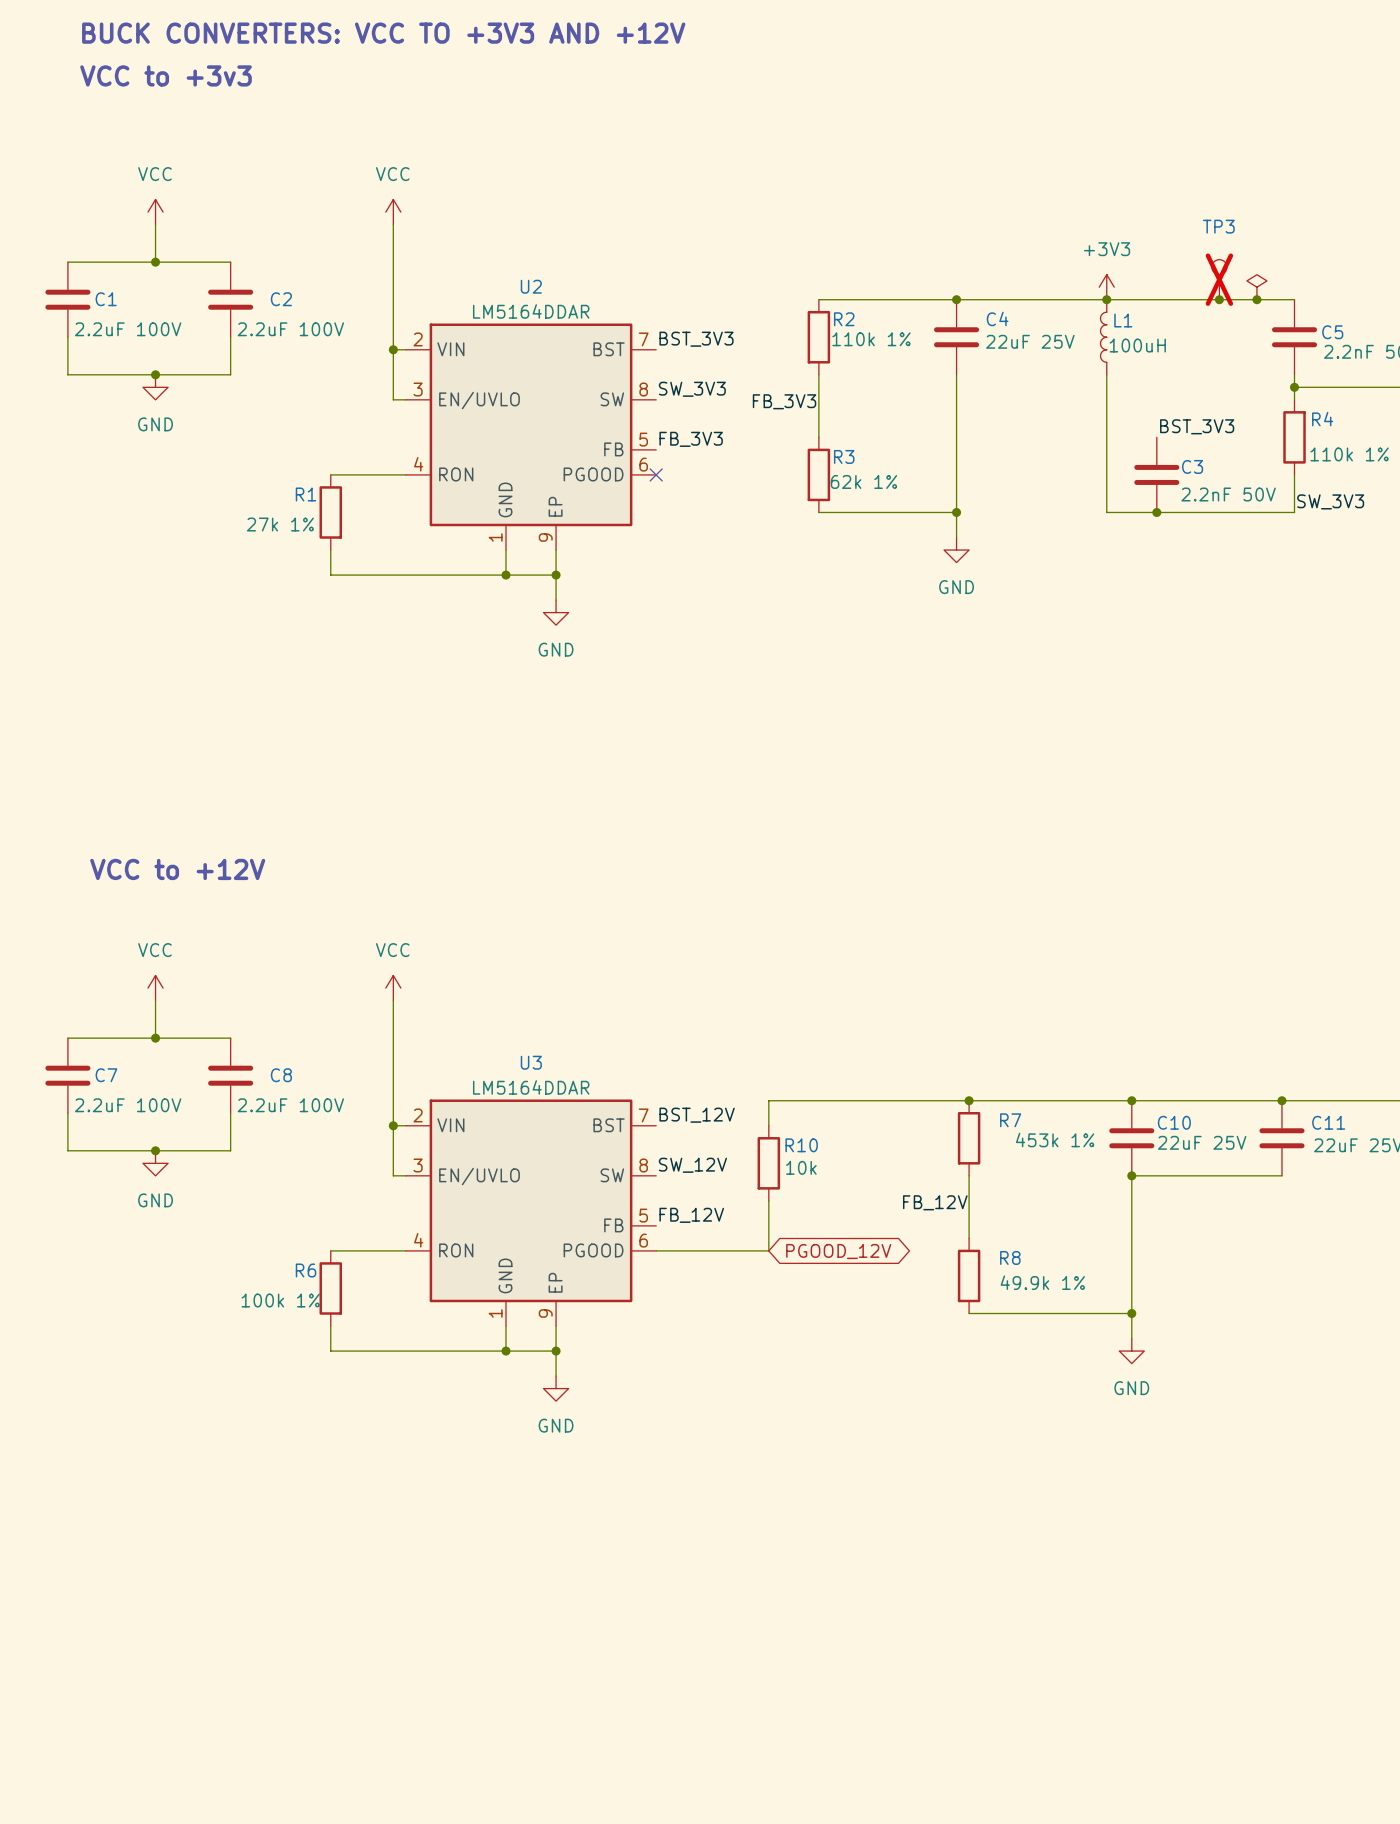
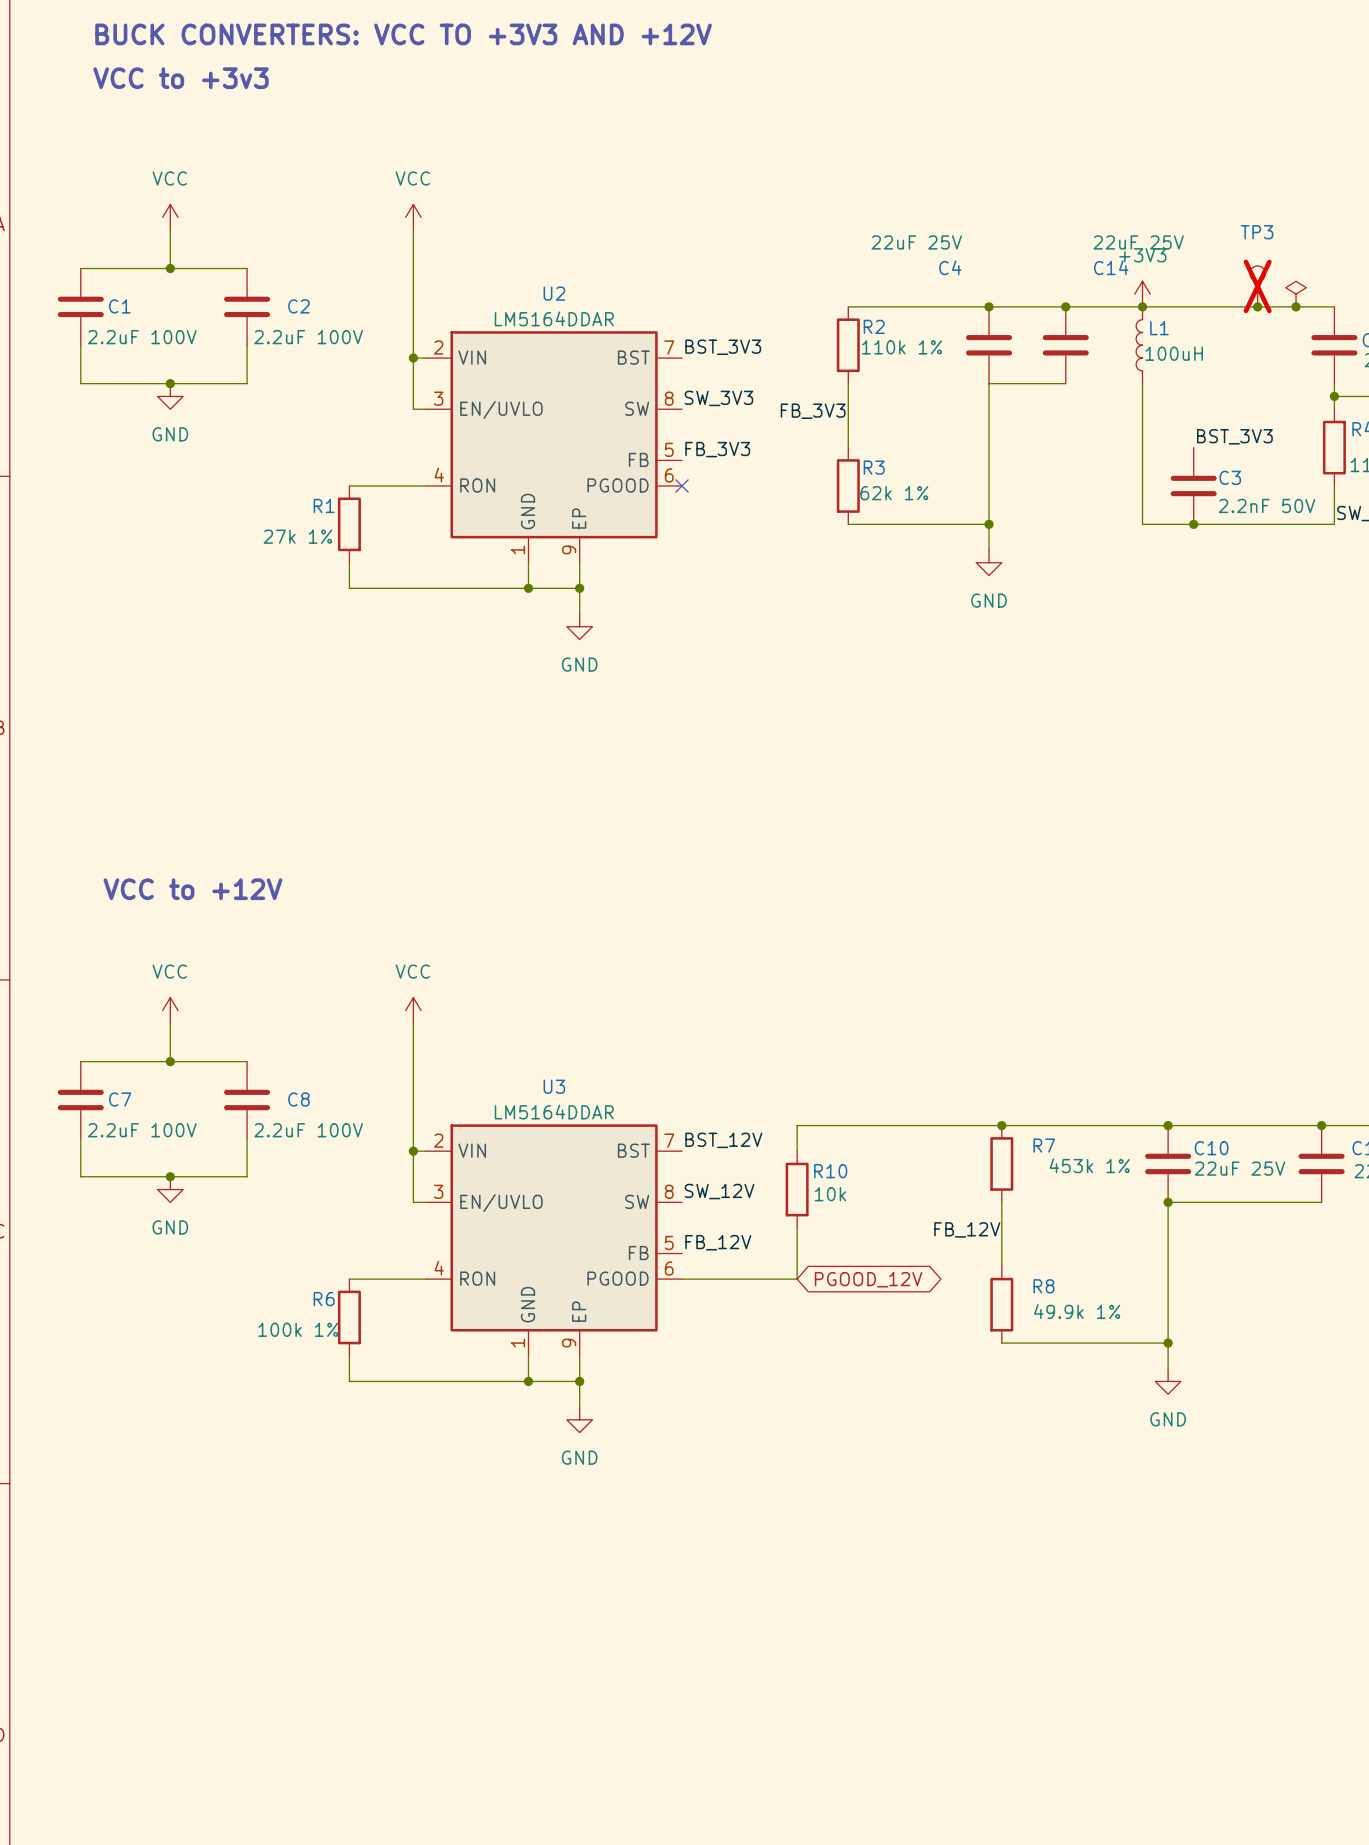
junction: none -> (1065, 306)
C4 name position: C4 (997, 318) -> C4 (950, 267)
C14: none -> 22uF 25V (1065, 345)
C4 value position: 22uF 25V (1030, 341) -> 22uF 25V (916, 242)
wire: none -> (989, 383) (1065, 383)

